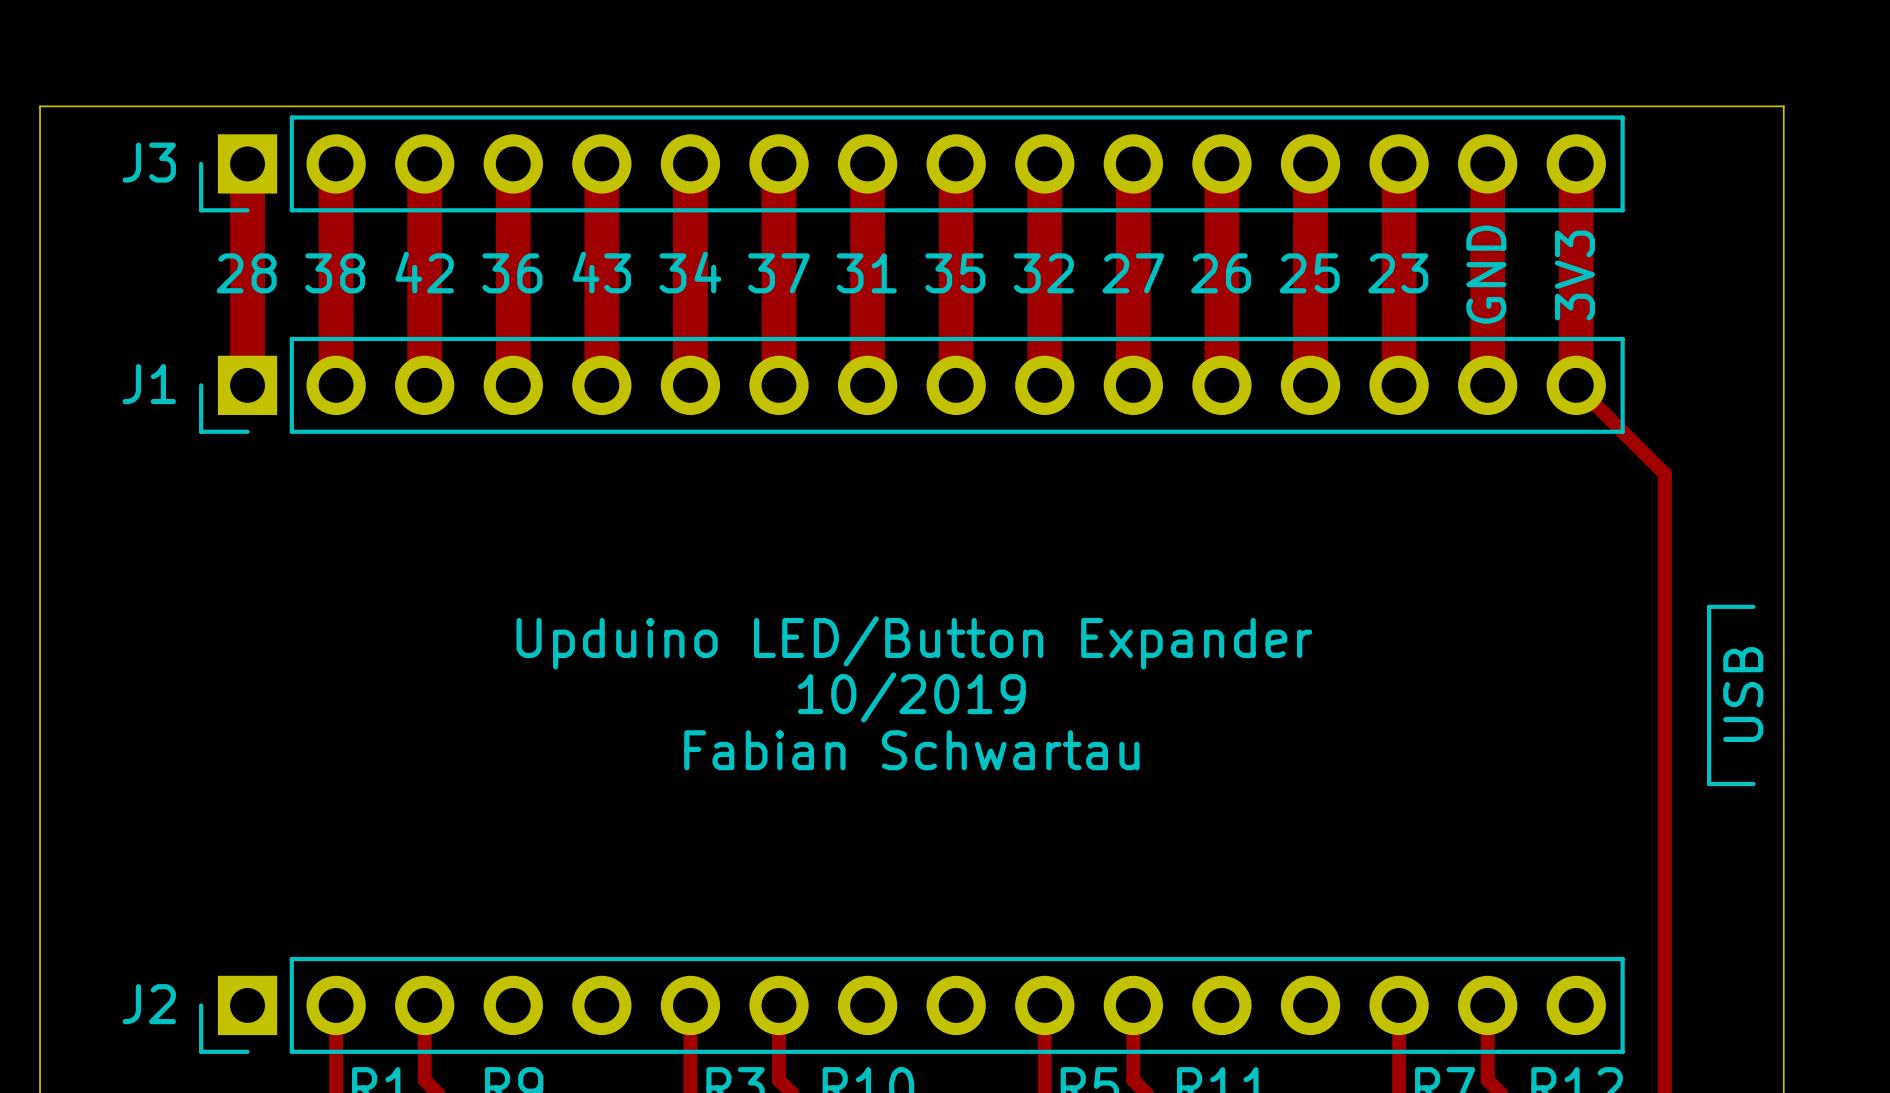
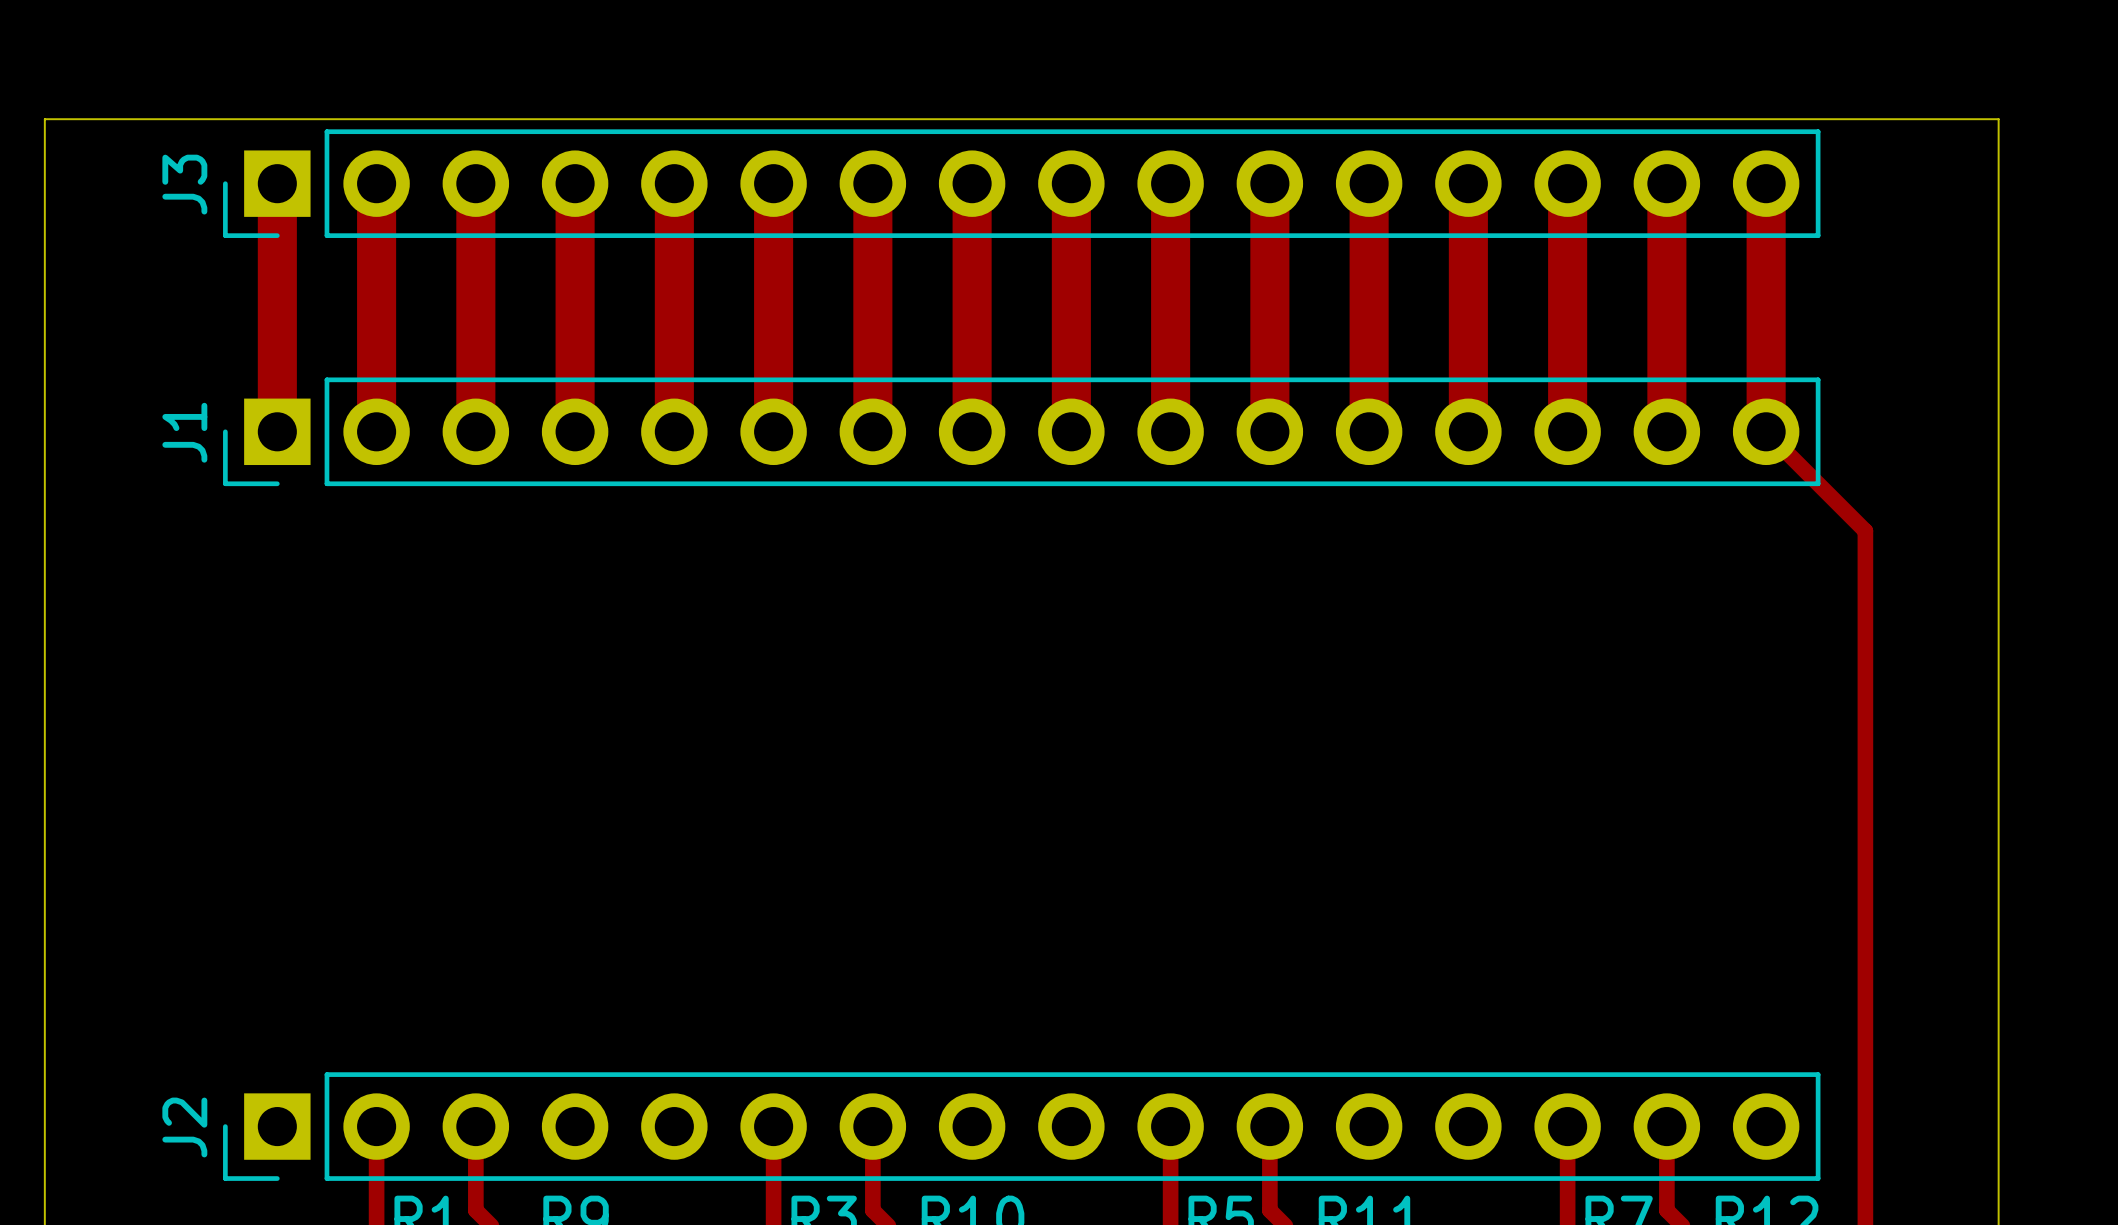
J3 name rotation: 0° (149, 162) -> 90° counterclockwise (184, 184)
text: 42 (424, 272) -> none
text: 43 (601, 272) -> none
text: 34 (690, 272) -> none
text: 28 (246, 273) -> none
text: 38 (335, 273) -> none
text: 36 (512, 273) -> none
text: 37 (779, 273) -> none
text: 31 (866, 273) -> none
text: 35 (955, 273) -> none
text: 32 (1043, 273) -> none
text: 27 (1133, 273) -> none
text: 26 (1221, 273) -> none
text: 25 (1309, 273) -> none
text: 23 (1398, 273) -> none
text: GND (1486, 274) -> none
text: 3V3 (1574, 275) -> none
J1 name rotation: 0° (149, 384) -> 90° counterclockwise (184, 432)
line: (1753, 606) (1709, 606) (1709, 783) (1753, 783) -> none
text: Upduino LED/Button Expander (914, 642) -> none
text: USB (1743, 694) -> none
text: 10/2019 (911, 697) -> none
text: Fabian Schwartau (911, 750) -> none
J2 name rotation: 0° (149, 1004) -> 90° counterclockwise (184, 1127)

